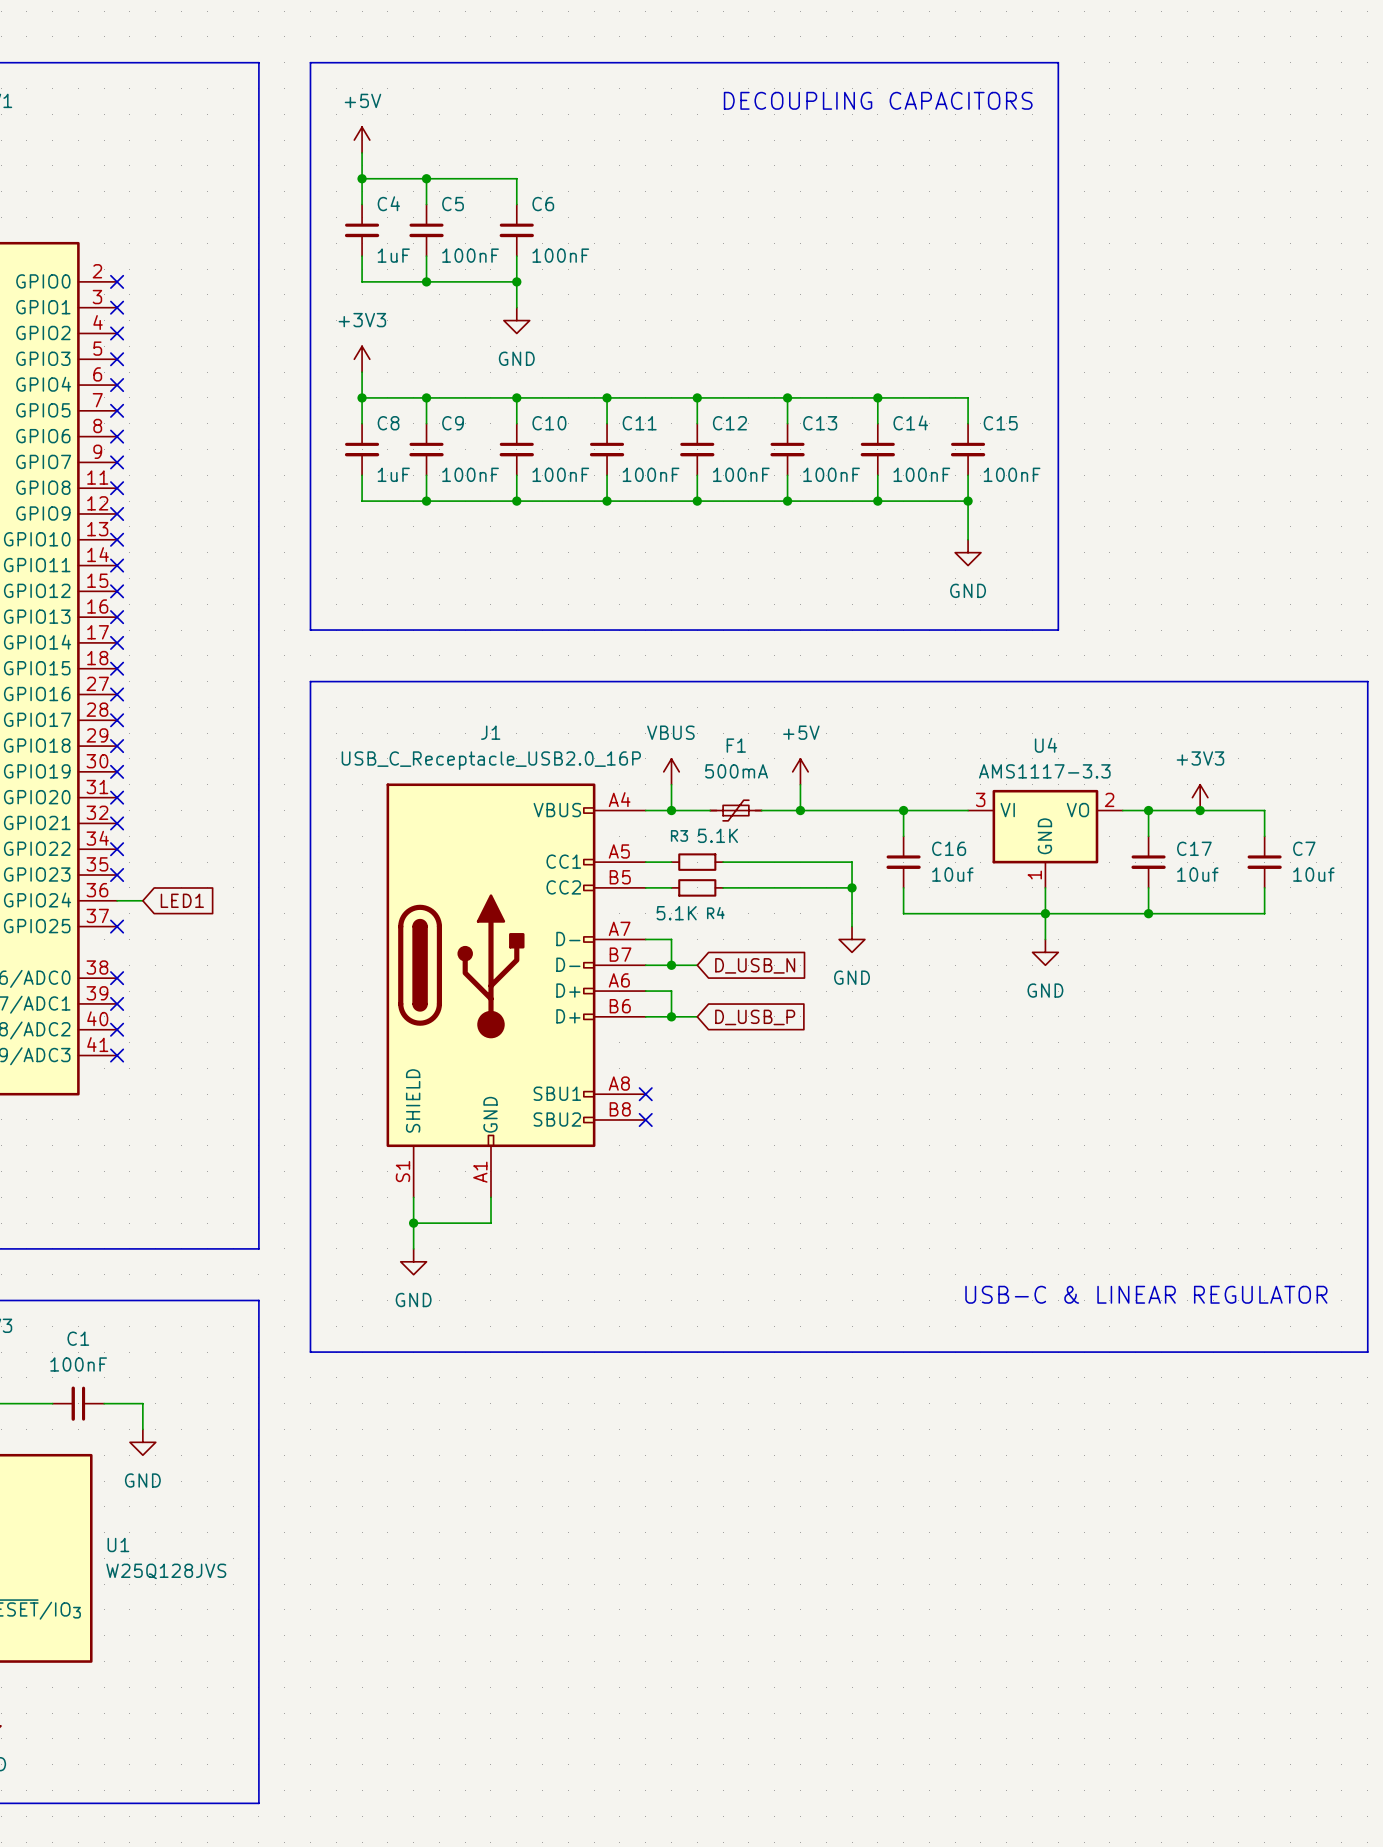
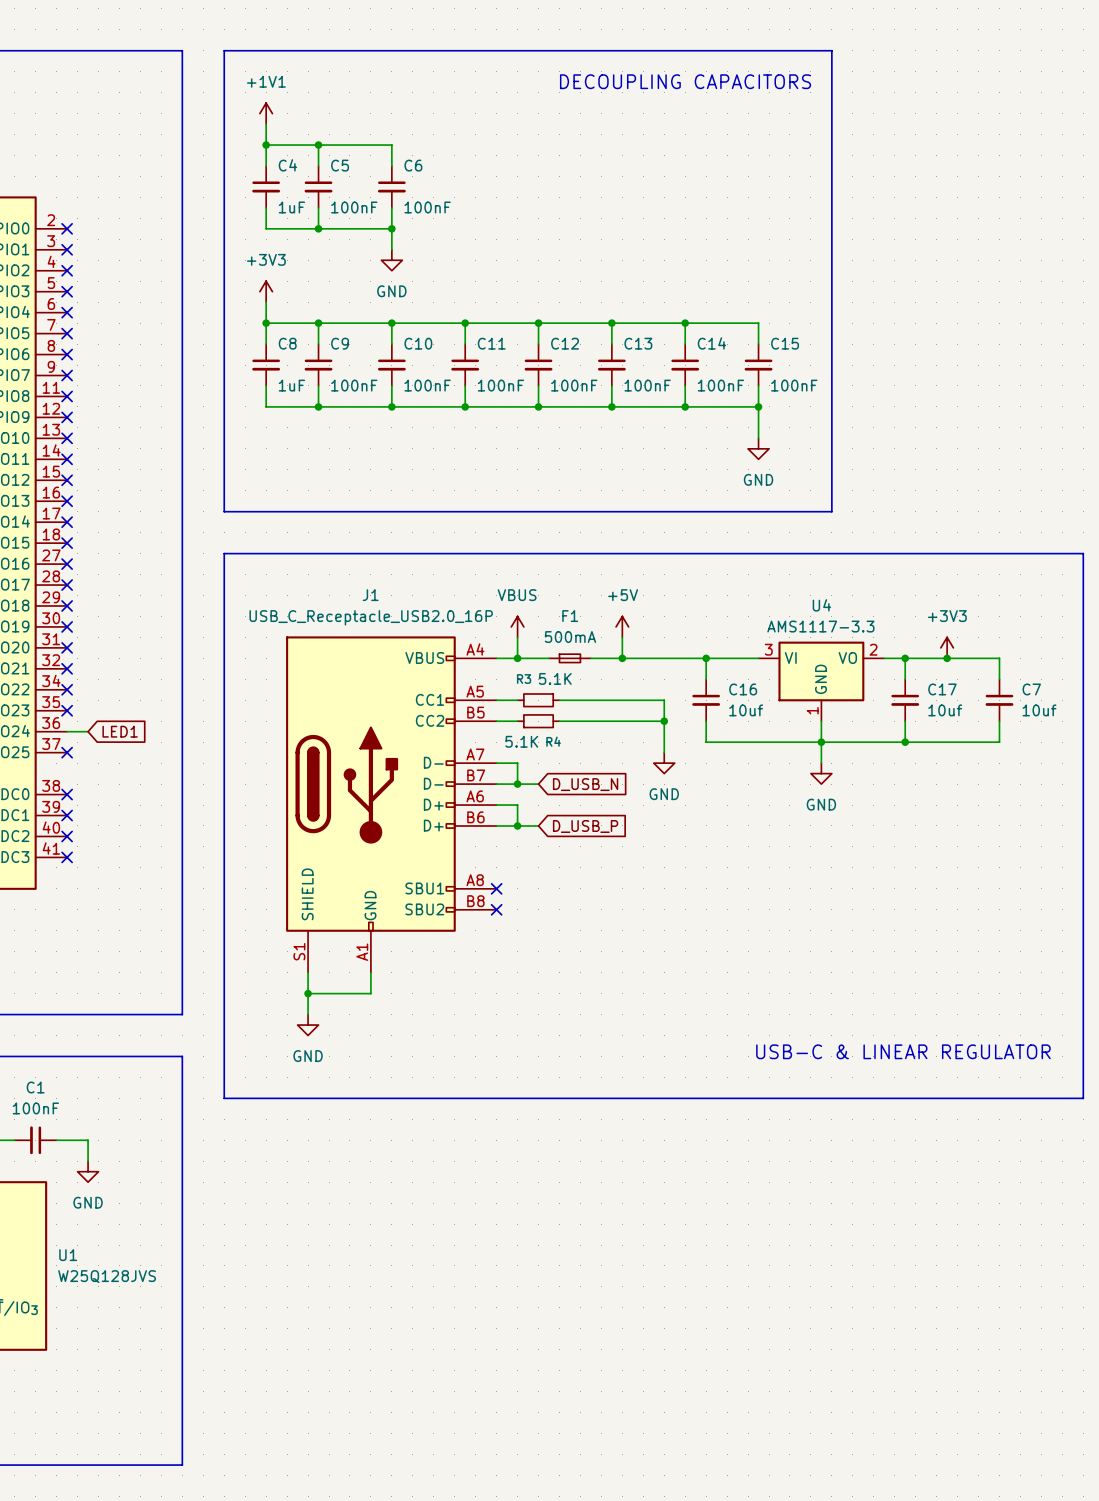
power symbol: +5V (362, 140) -> +1V1 (266, 113)
F1 symbol: [710, 800, 762, 821] -> [549, 654, 591, 663]

